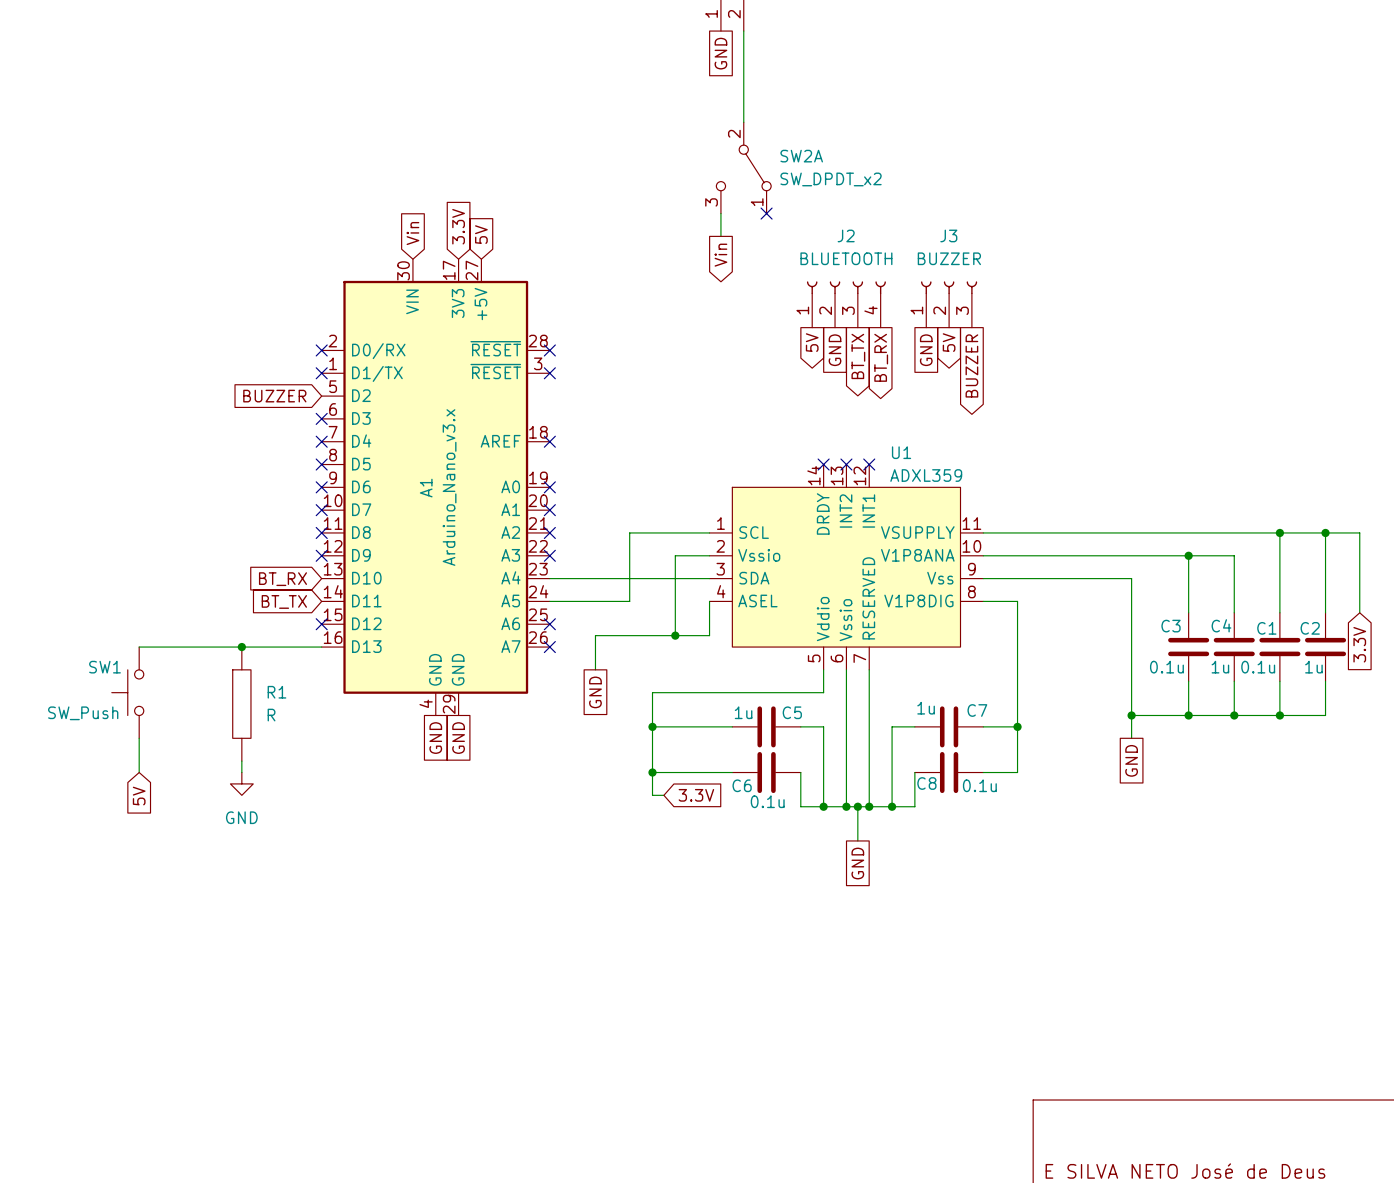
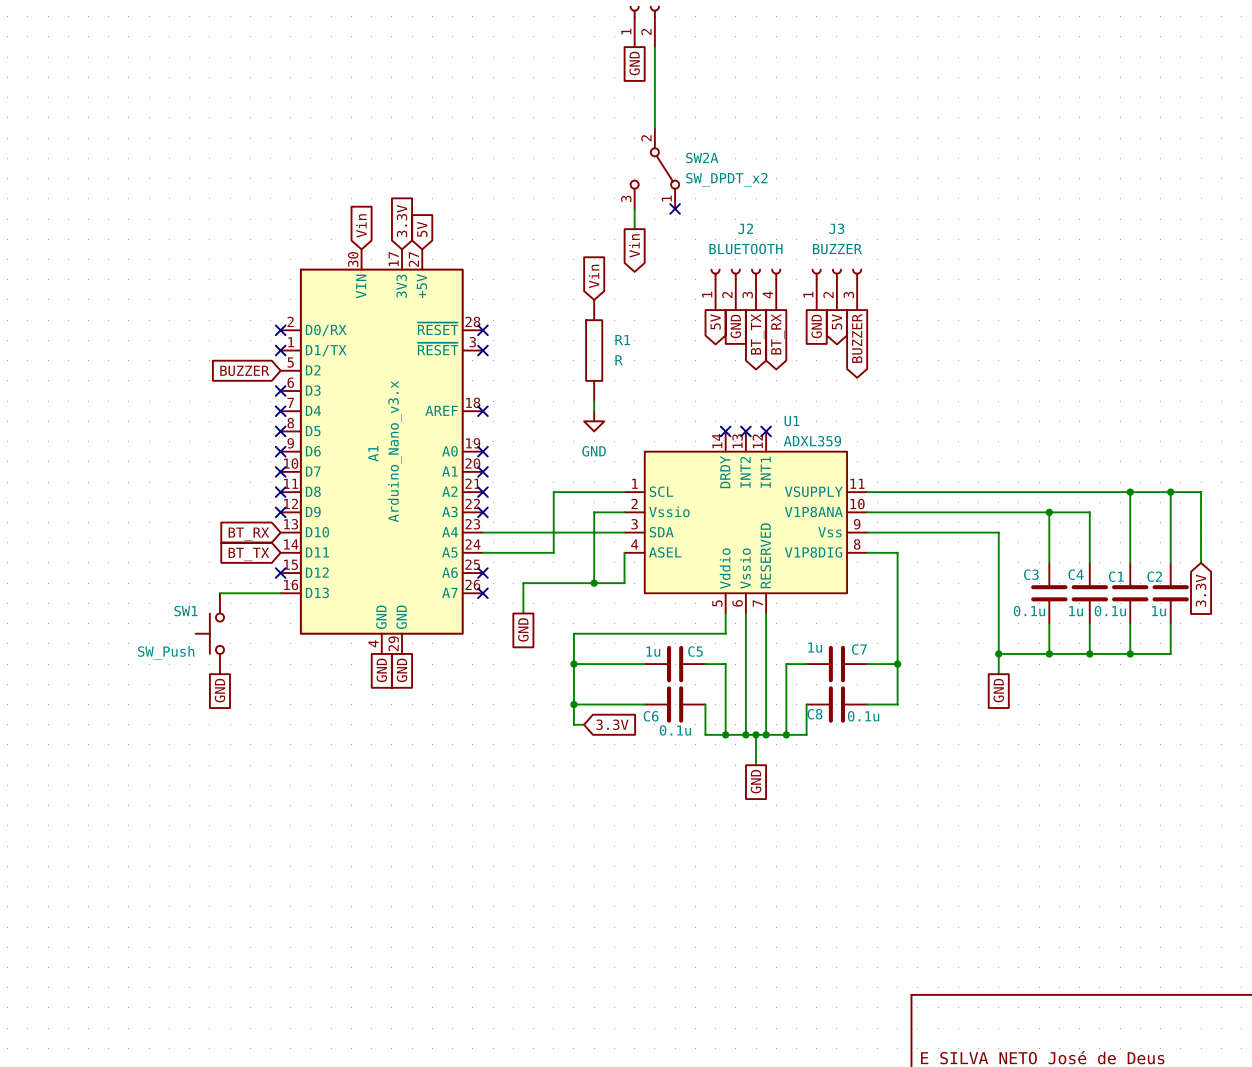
global label: none -> Vin (593, 276)
wire: none -> (594, 401) (594, 411)
power symbol: none -> GND (594, 421)
wire: (139, 647) (253, 647) -> none
junction: (241, 647) -> none
SW1 position: (127, 692) -> (209, 633)
R1 position: (241, 704) -> (594, 350)
wire: (139, 738) (139, 772) -> none
global label: none -> GND (219, 690)
power symbol: GND (241, 783) -> none
global label: 5V (139, 796) -> none

